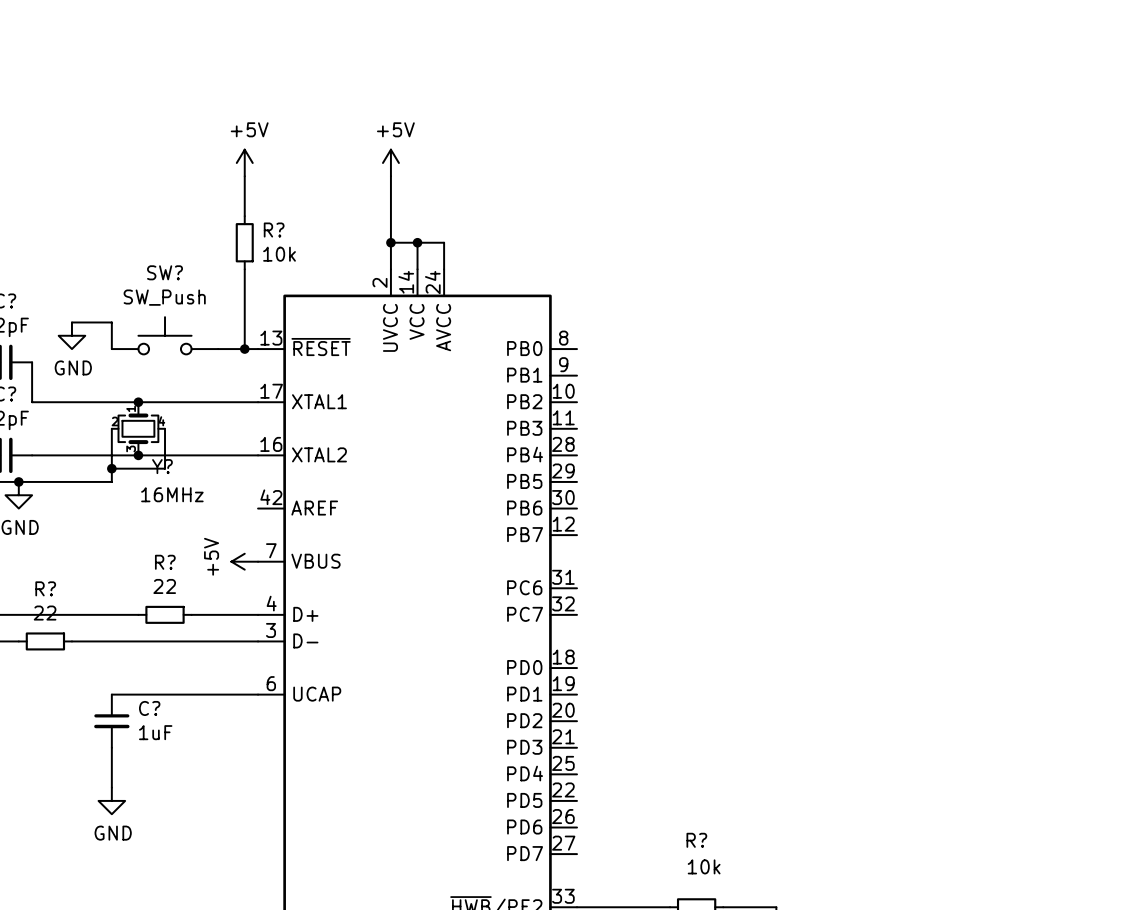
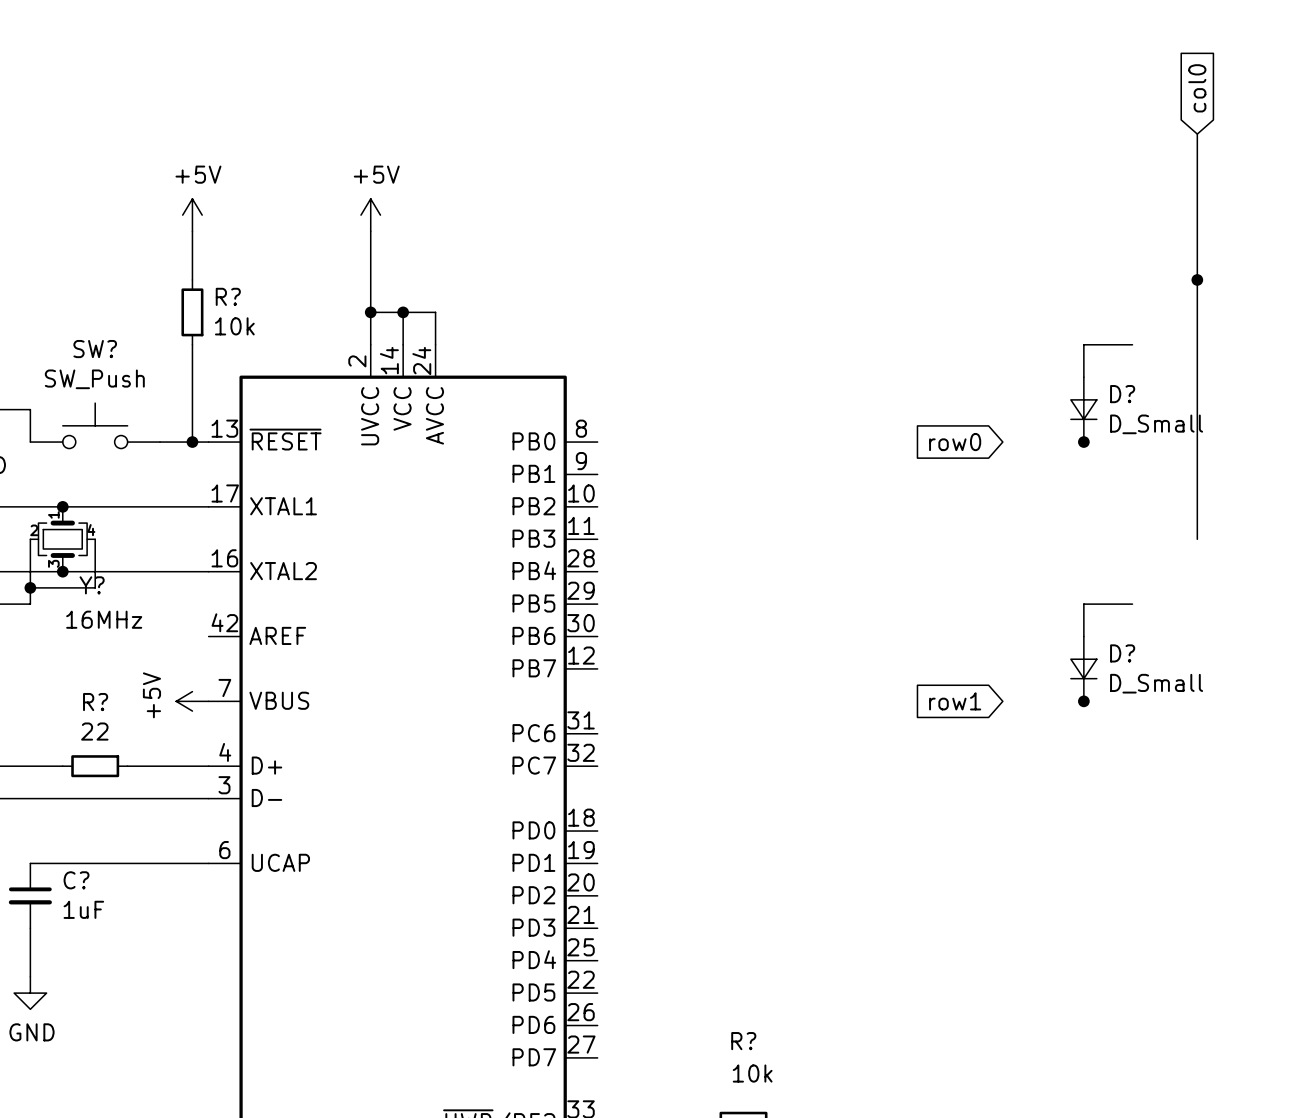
global label: none -> col0 (1197, 88)
wire: none -> (1197, 134) (1197, 539)
junction: none -> (1197, 279)
wire: none -> (1132, 344) (1083, 344) (1083, 377)
D?: none -> D_Small (1083, 409)
global label: none -> row0 (955, 442)
junction: none -> (1083, 442)
wire: none -> (1132, 604) (1083, 604) (1083, 636)
D?: none -> D_Small (1083, 668)
global label: none -> row1 (955, 701)
junction: none -> (1083, 701)

